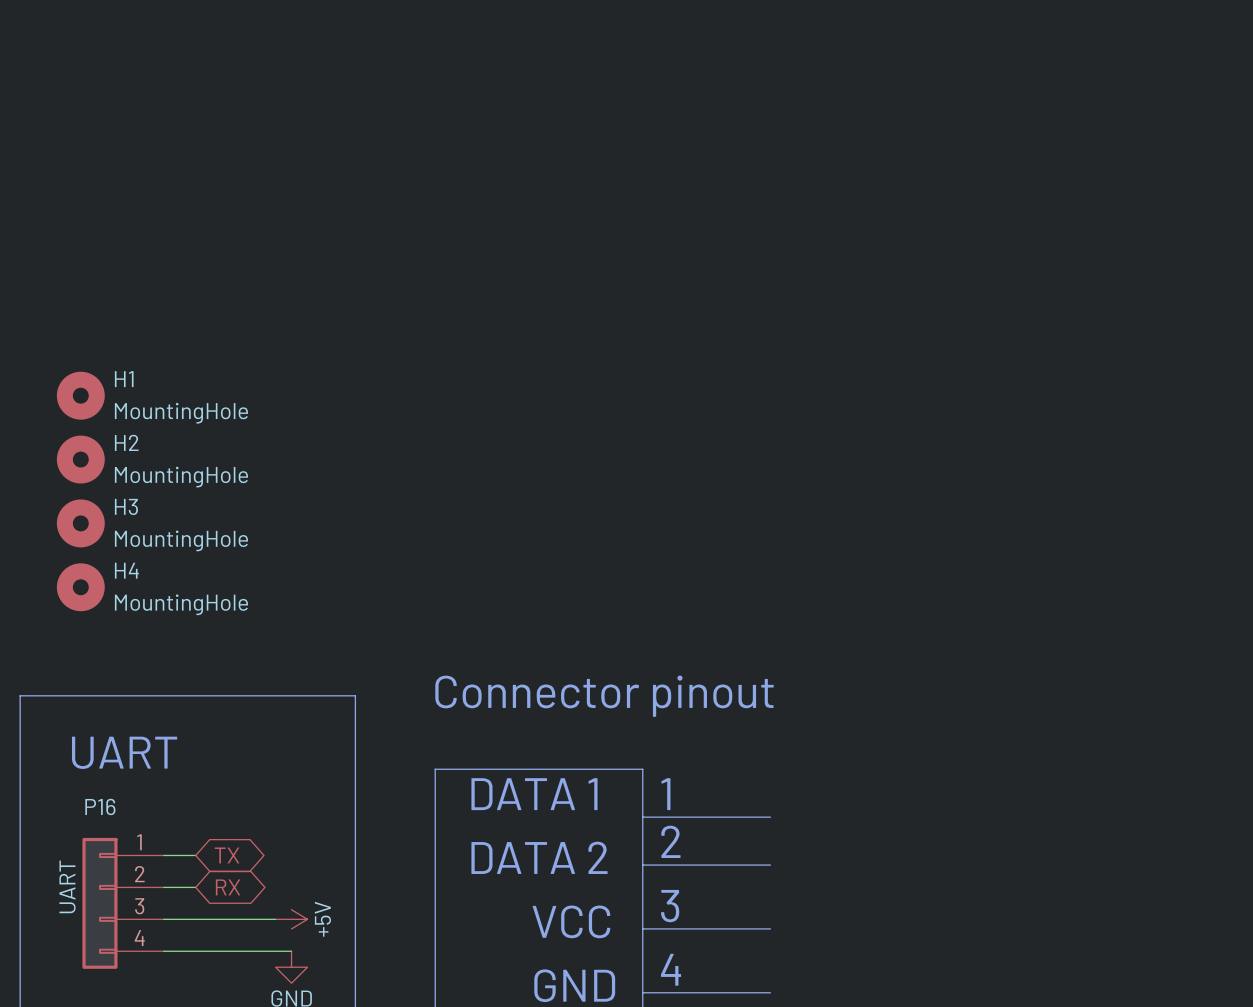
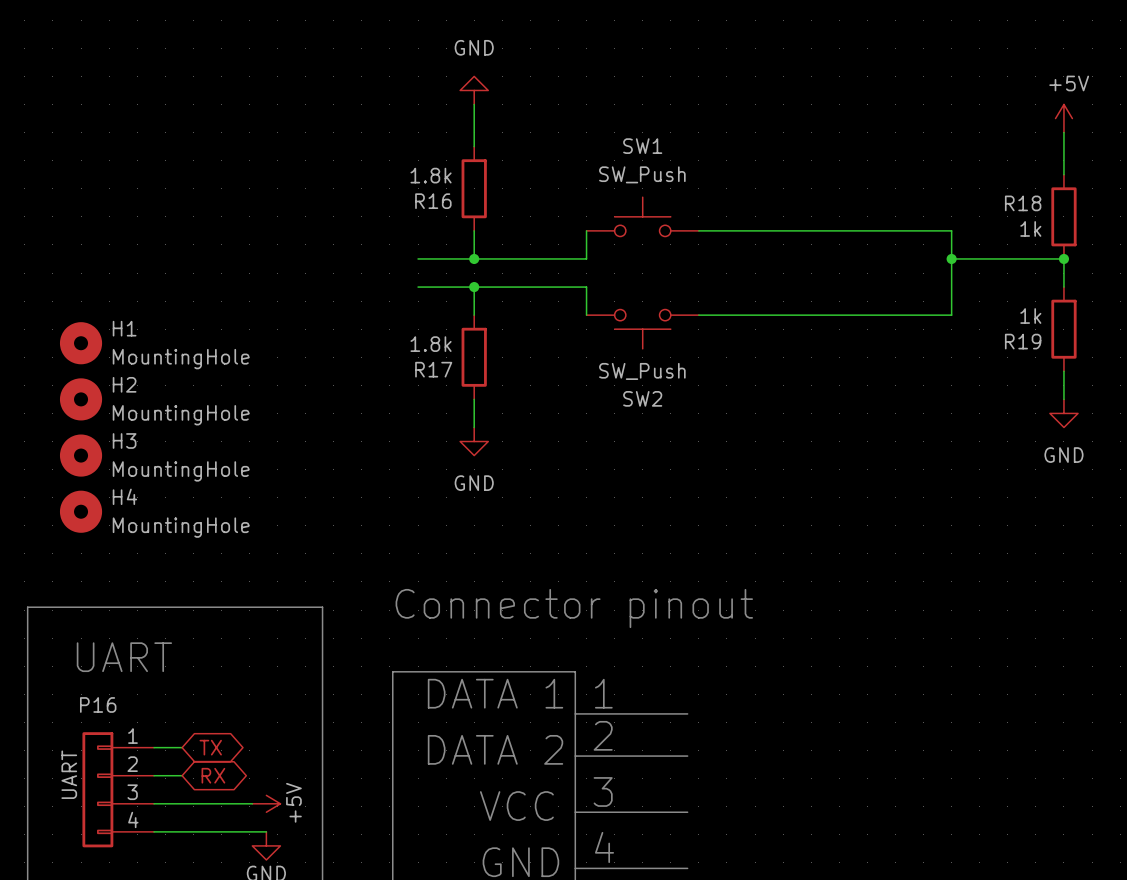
power symbol: none -> GND (474, 90)
wire: none -> (474, 104) (474, 146)
power symbol: none -> +5V (1063, 118)
wire: none -> (1063, 132) (1063, 174)
R16: none -> 1.8k (474, 188)
SW1: none -> SW_Push (642, 216)
R18: none -> 1k (1063, 216)
wire: none -> (474, 230) (474, 258)
wire: none -> (586, 230) (586, 258) (418, 258)
wire: none -> (698, 230) (951, 230) (951, 315) (698, 315)
junction: none -> (474, 258)
wire: none -> (951, 258) (1063, 258) (1063, 287)
junction: none -> (951, 258)
junction: none -> (1063, 258)
wire: none -> (418, 287) (586, 287) (586, 315)
wire: none -> (474, 287) (474, 315)
junction: none -> (474, 287)
SW2: none -> SW_Push (642, 329)
R19: none -> 1k (1063, 329)
R17: none -> 1.8k (474, 357)
wire: none -> (1063, 371) (1063, 399)
wire: none -> (474, 399) (474, 427)
power symbol: none -> GND (1063, 413)
power symbol: none -> GND (474, 441)

